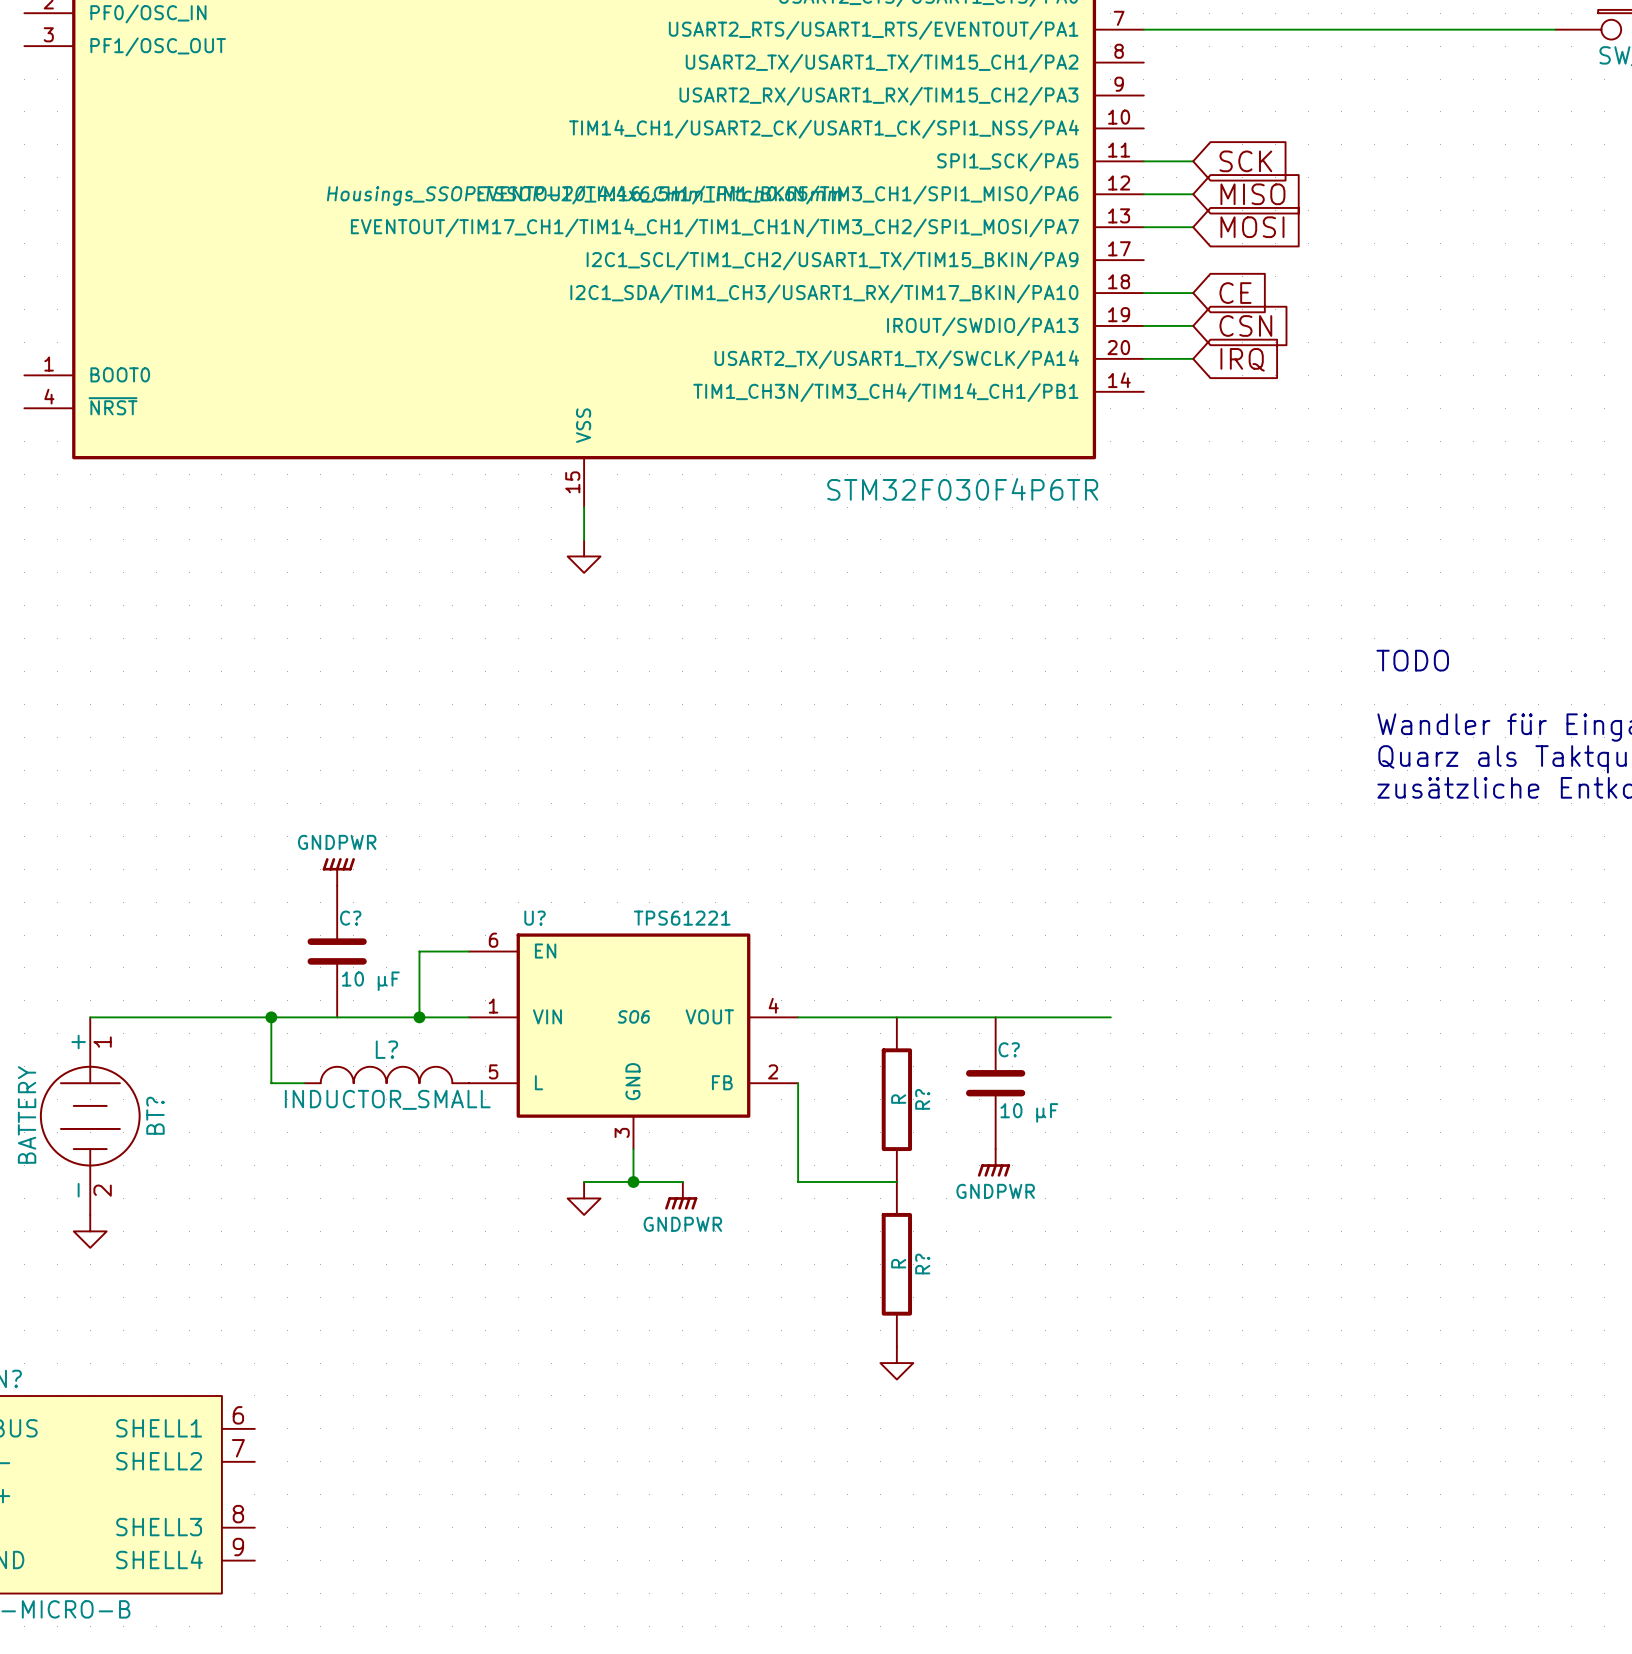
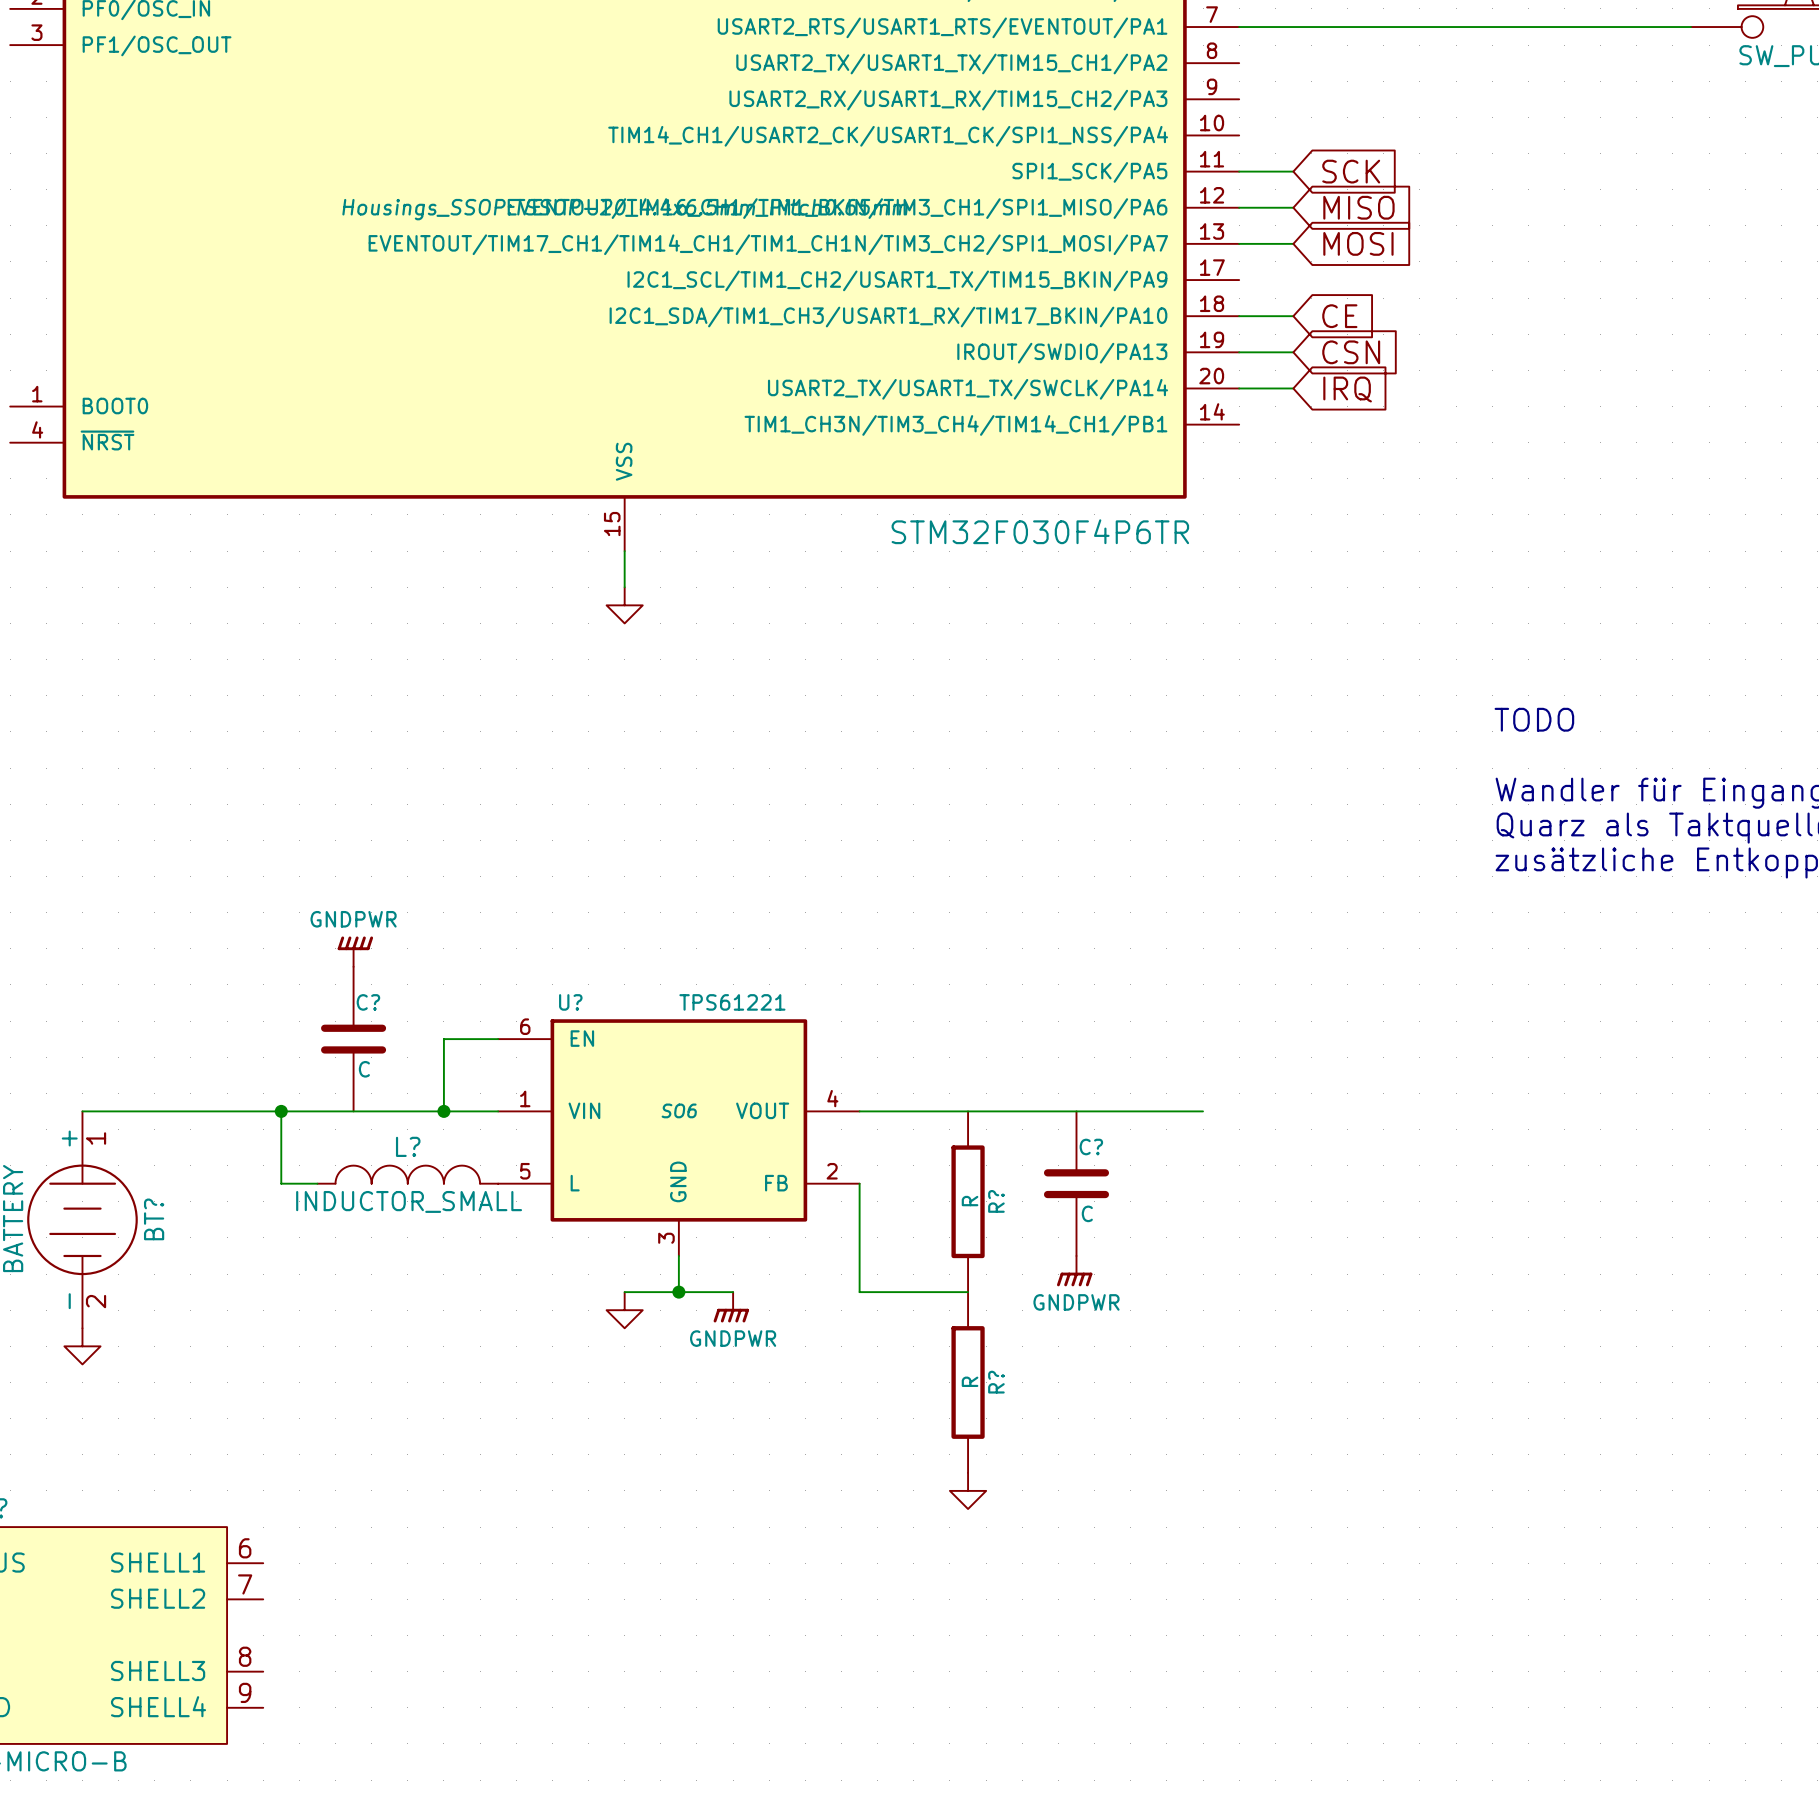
C? value: 10 μF (370, 981) -> C (364, 1069)
C? value: 10 μF (1029, 1112) -> C (1087, 1213)

